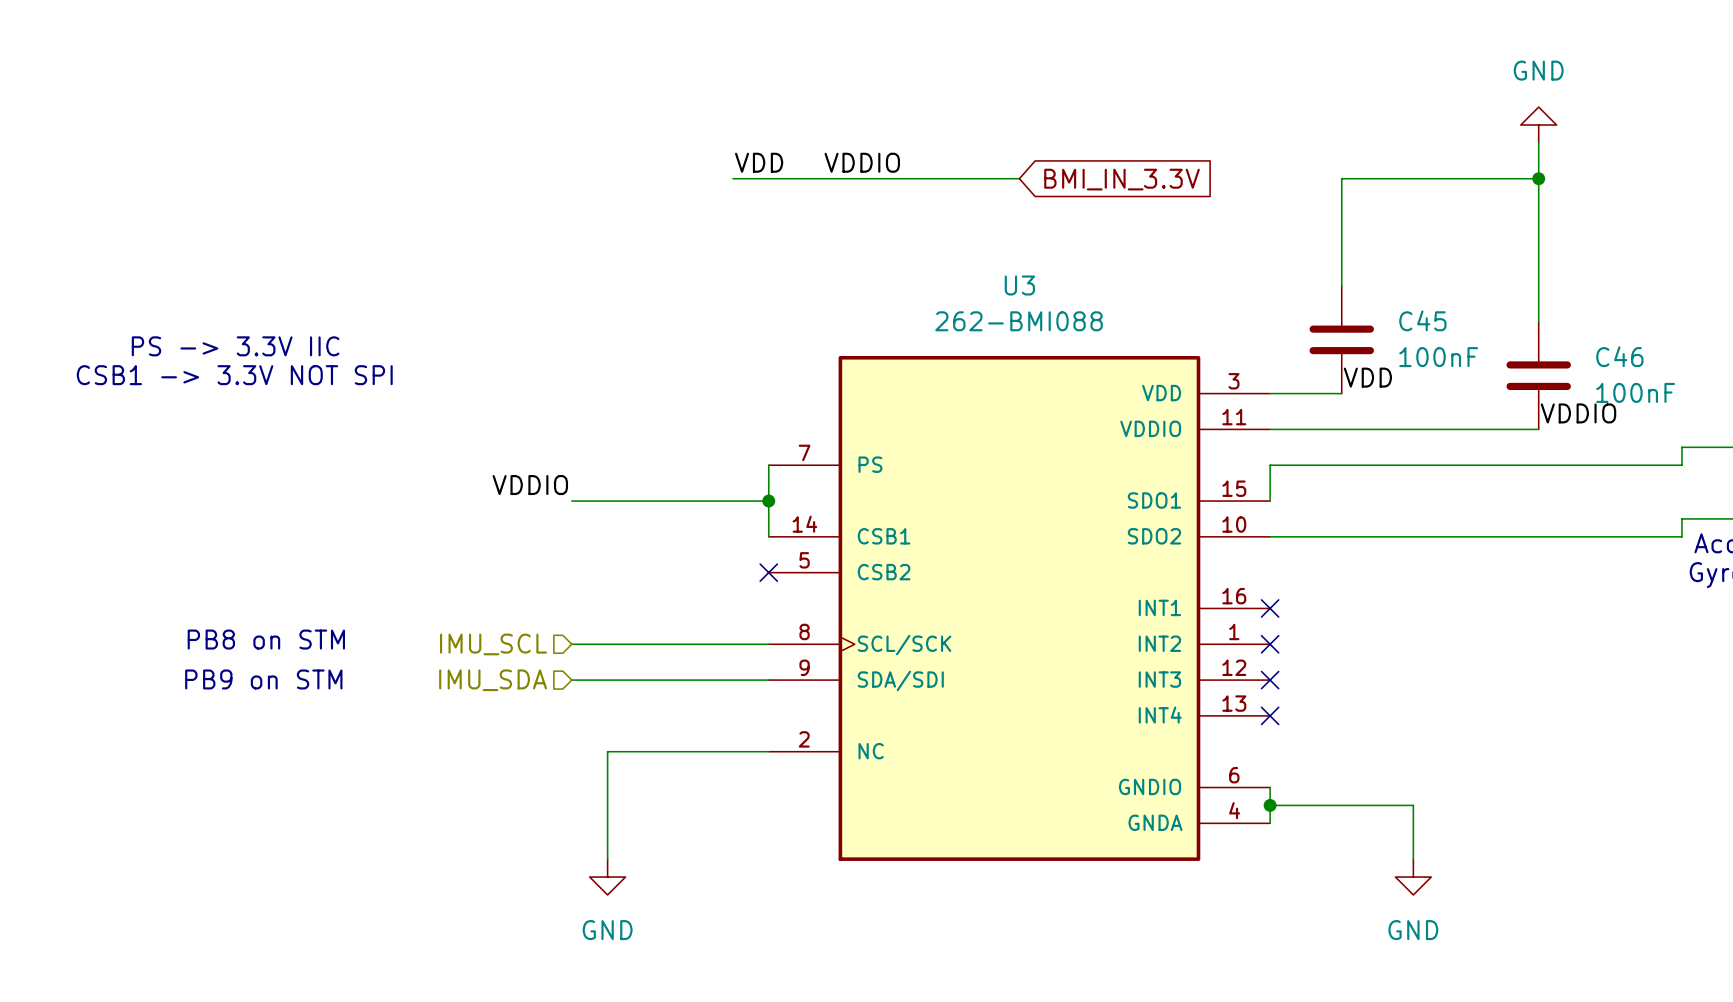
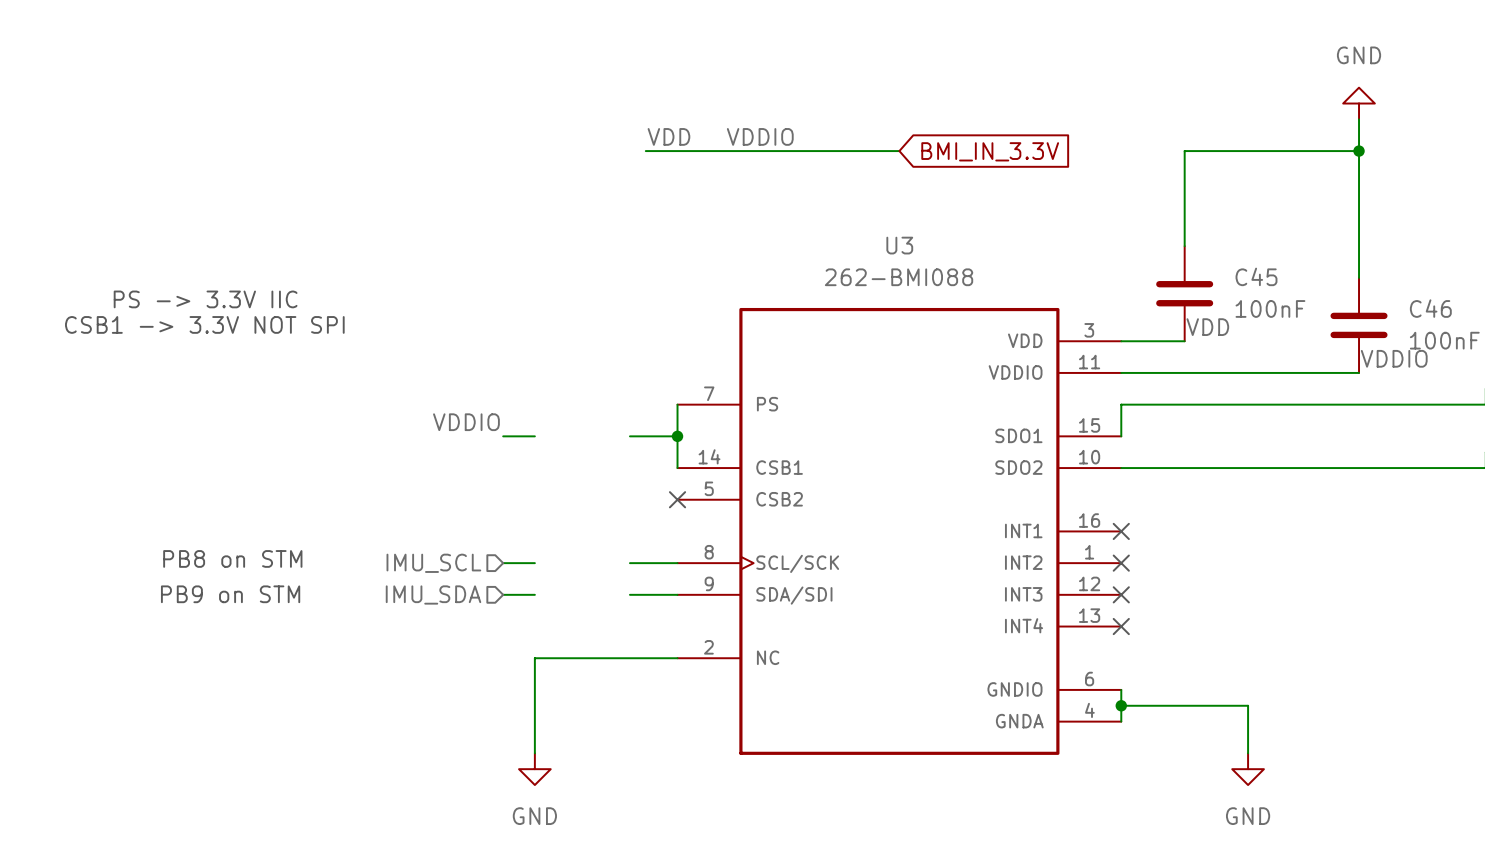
wire: (607, 501) (715, 501) -> none
wire: (607, 644) (715, 644) -> none
wire: (607, 680) (715, 680) -> none

